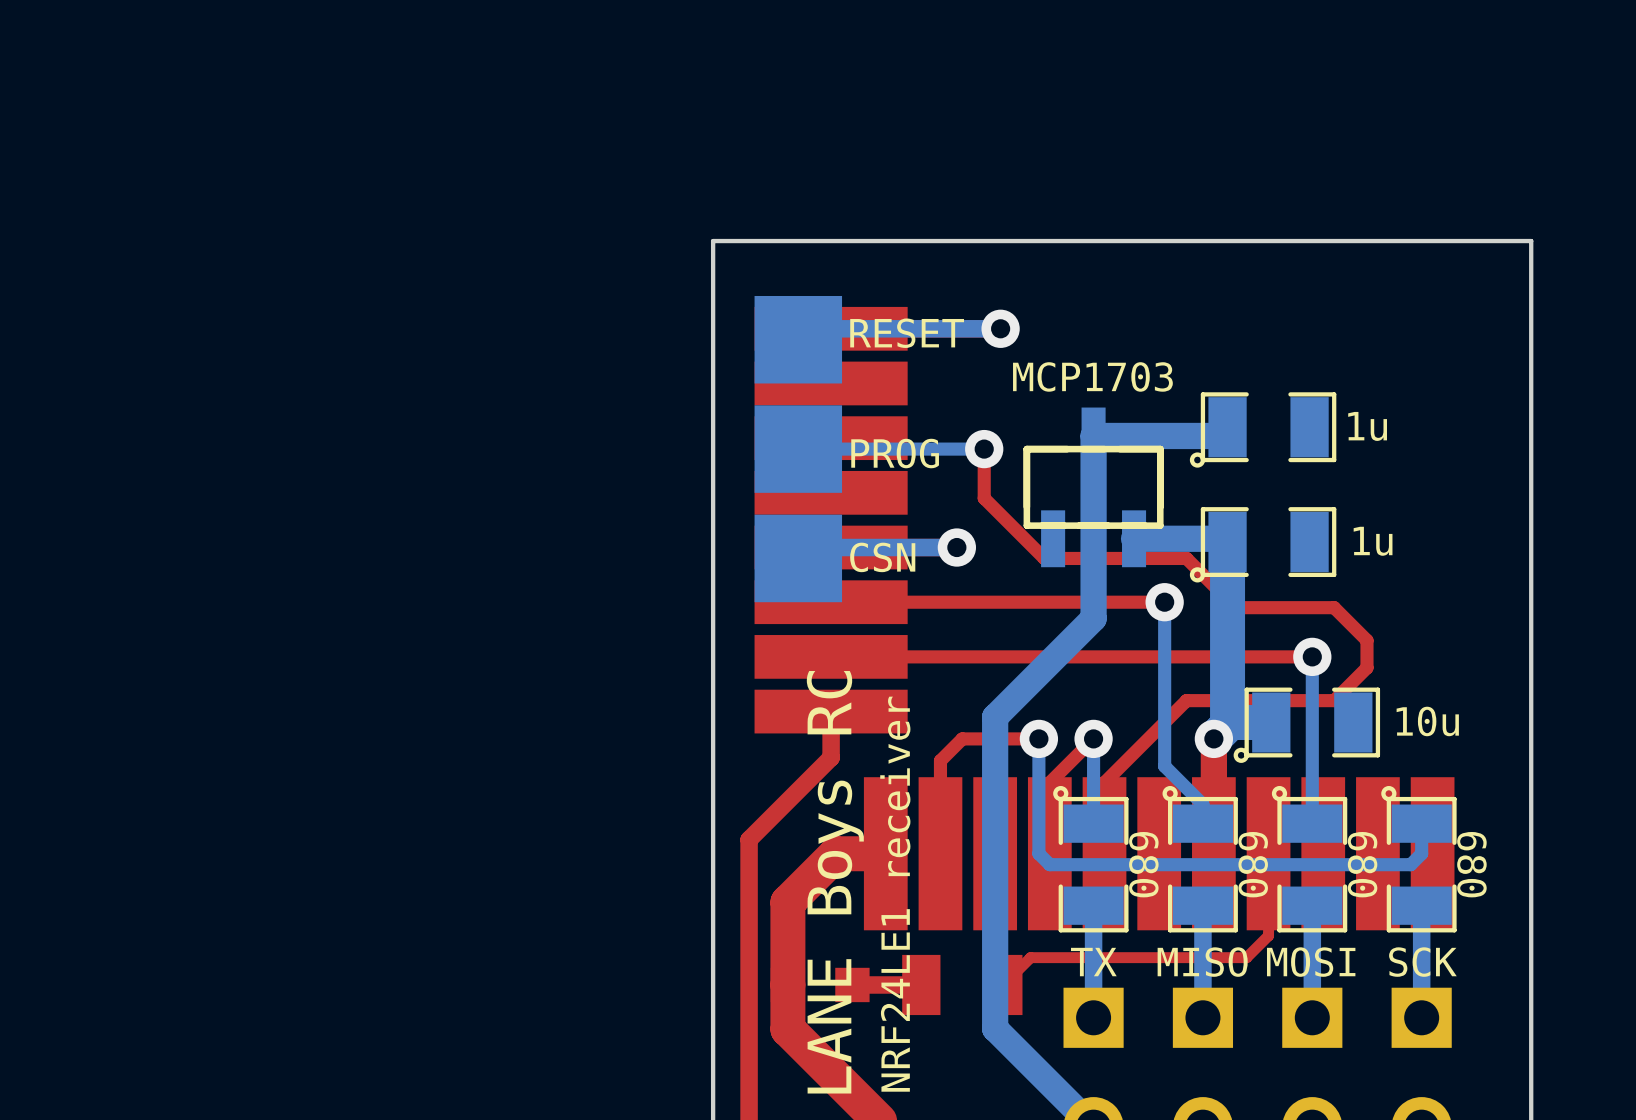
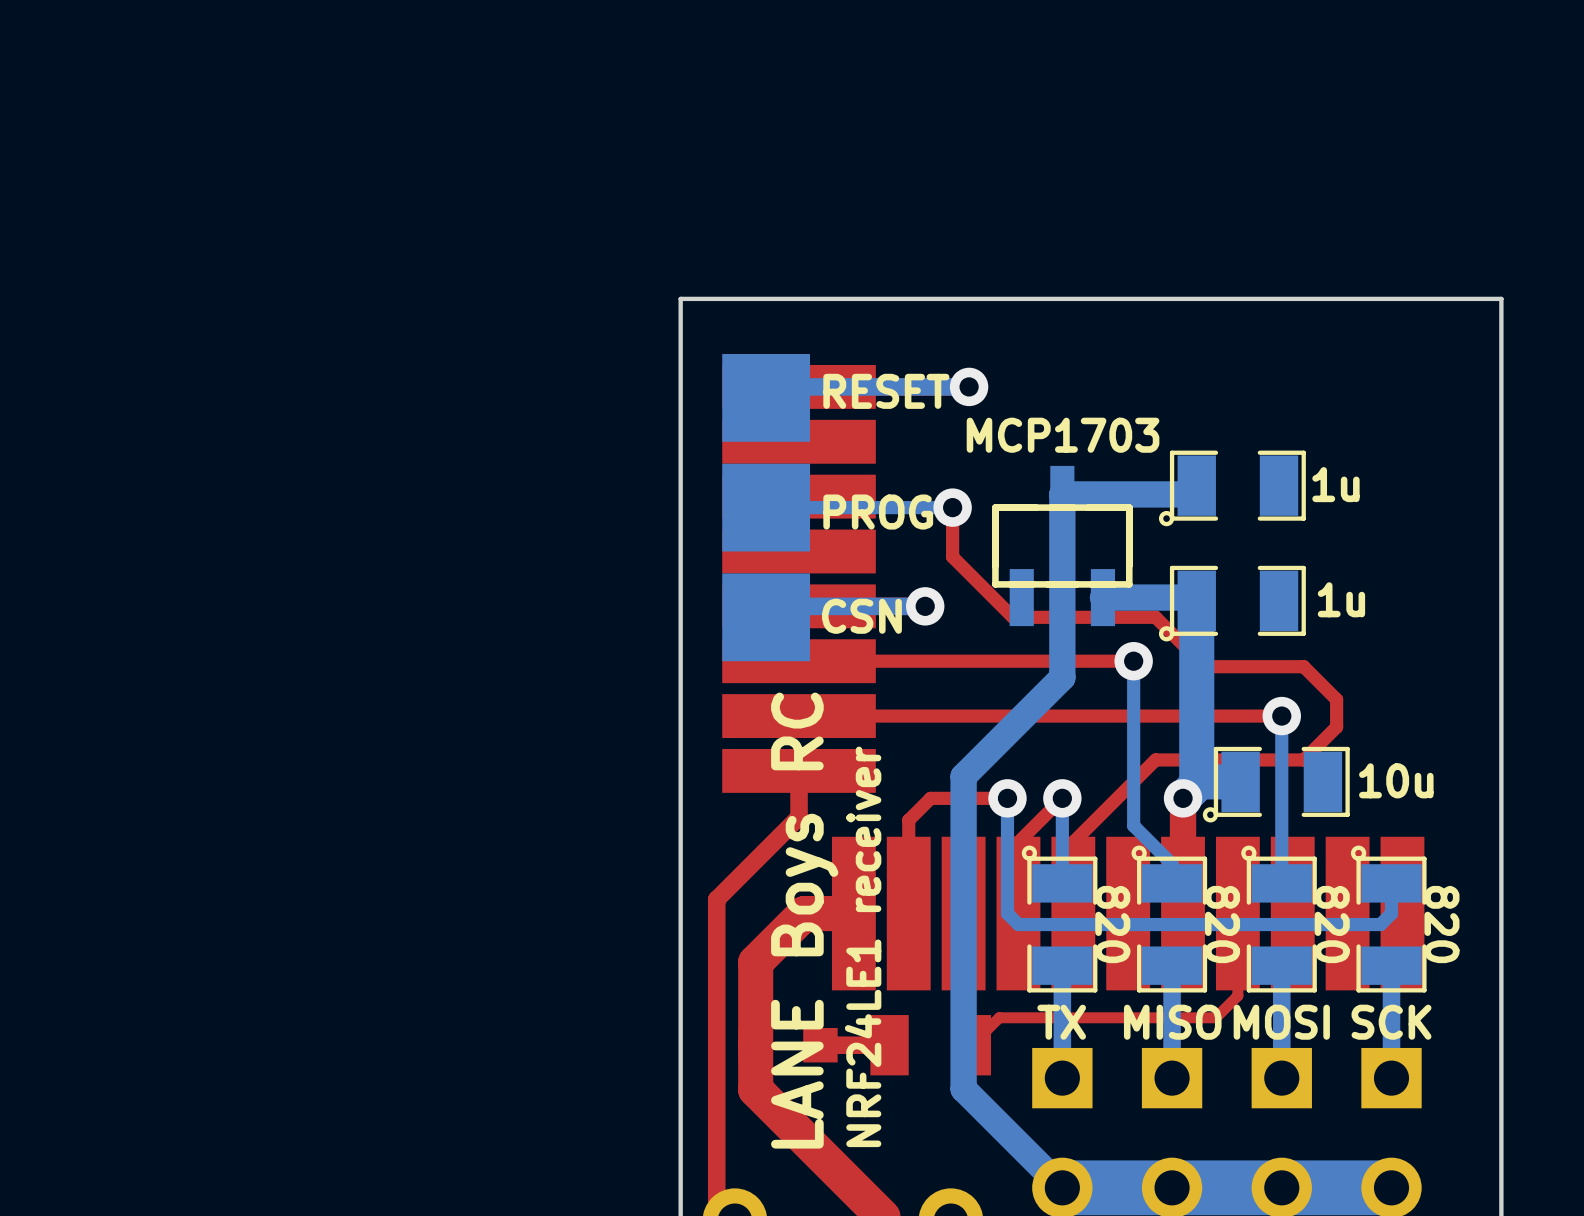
part value: 680 (1143, 864) -> 820 (1112, 924)
part value: 680 (1253, 864) -> 820 (1222, 924)
part value: 680 (1362, 864) -> 820 (1332, 924)
part value: 680 (1471, 864) -> 820 (1441, 924)

